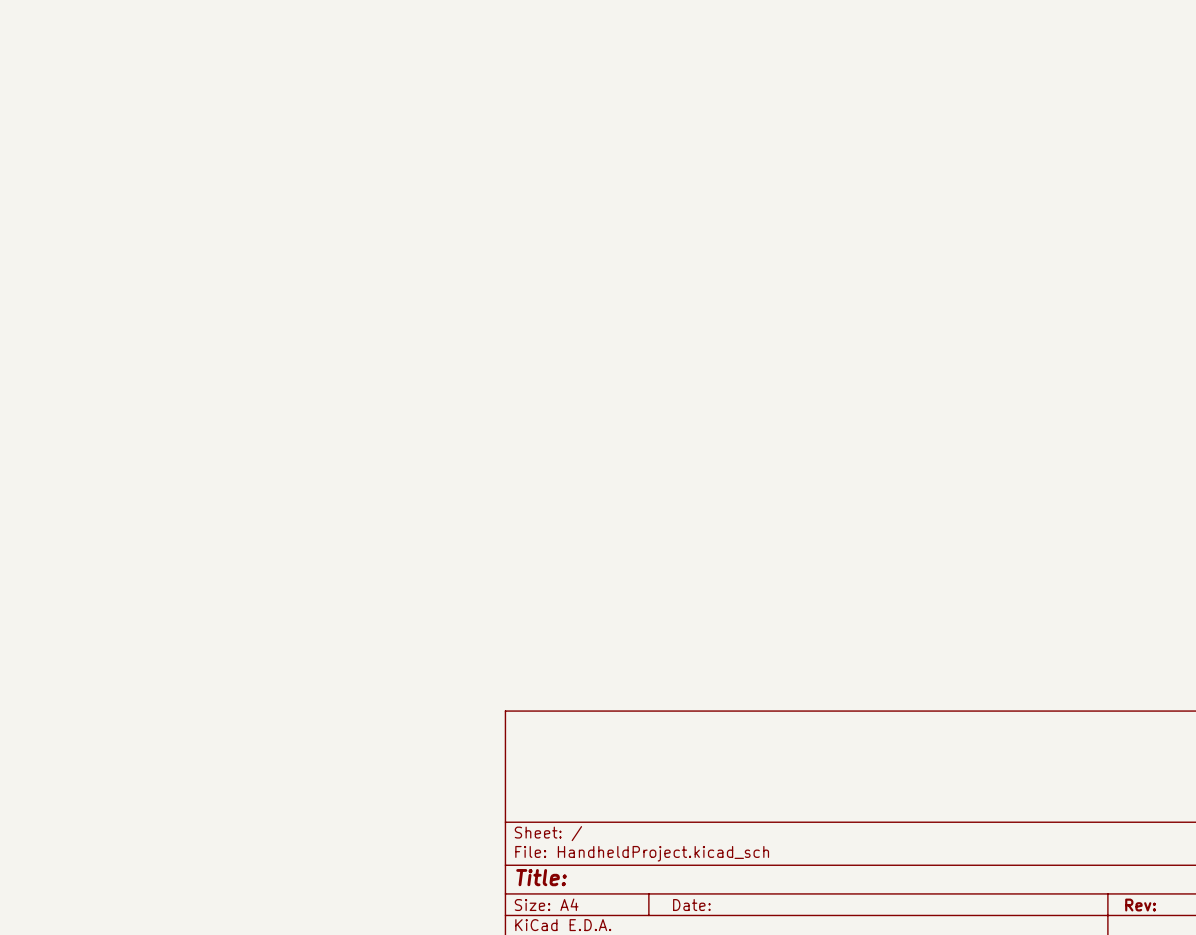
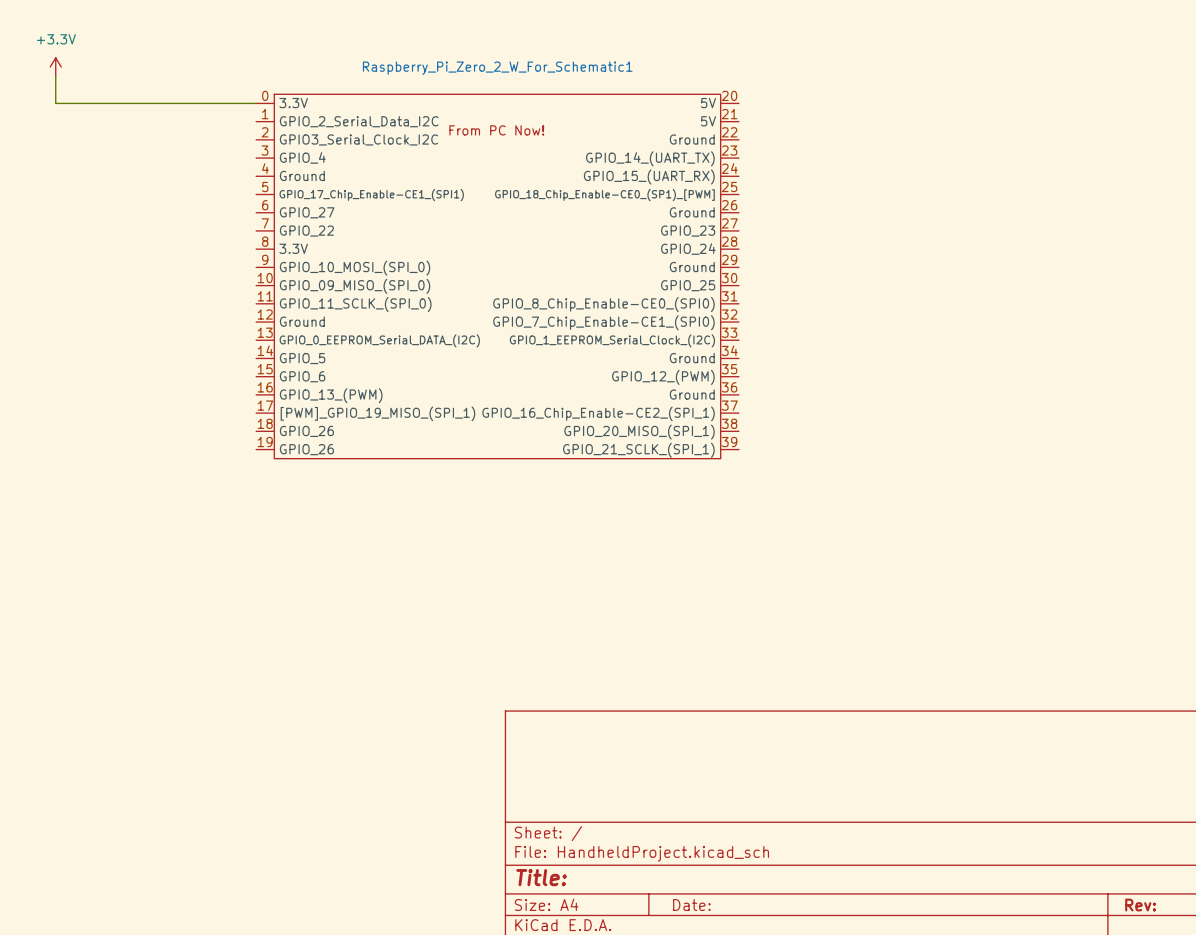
power symbol: none -> +3.3V (55, 66)
wire: none -> (55, 76) (55, 103) (256, 103)
Raspberry_Pi_Zero_2_W_For_Schematic1: none -> (497, 276)

